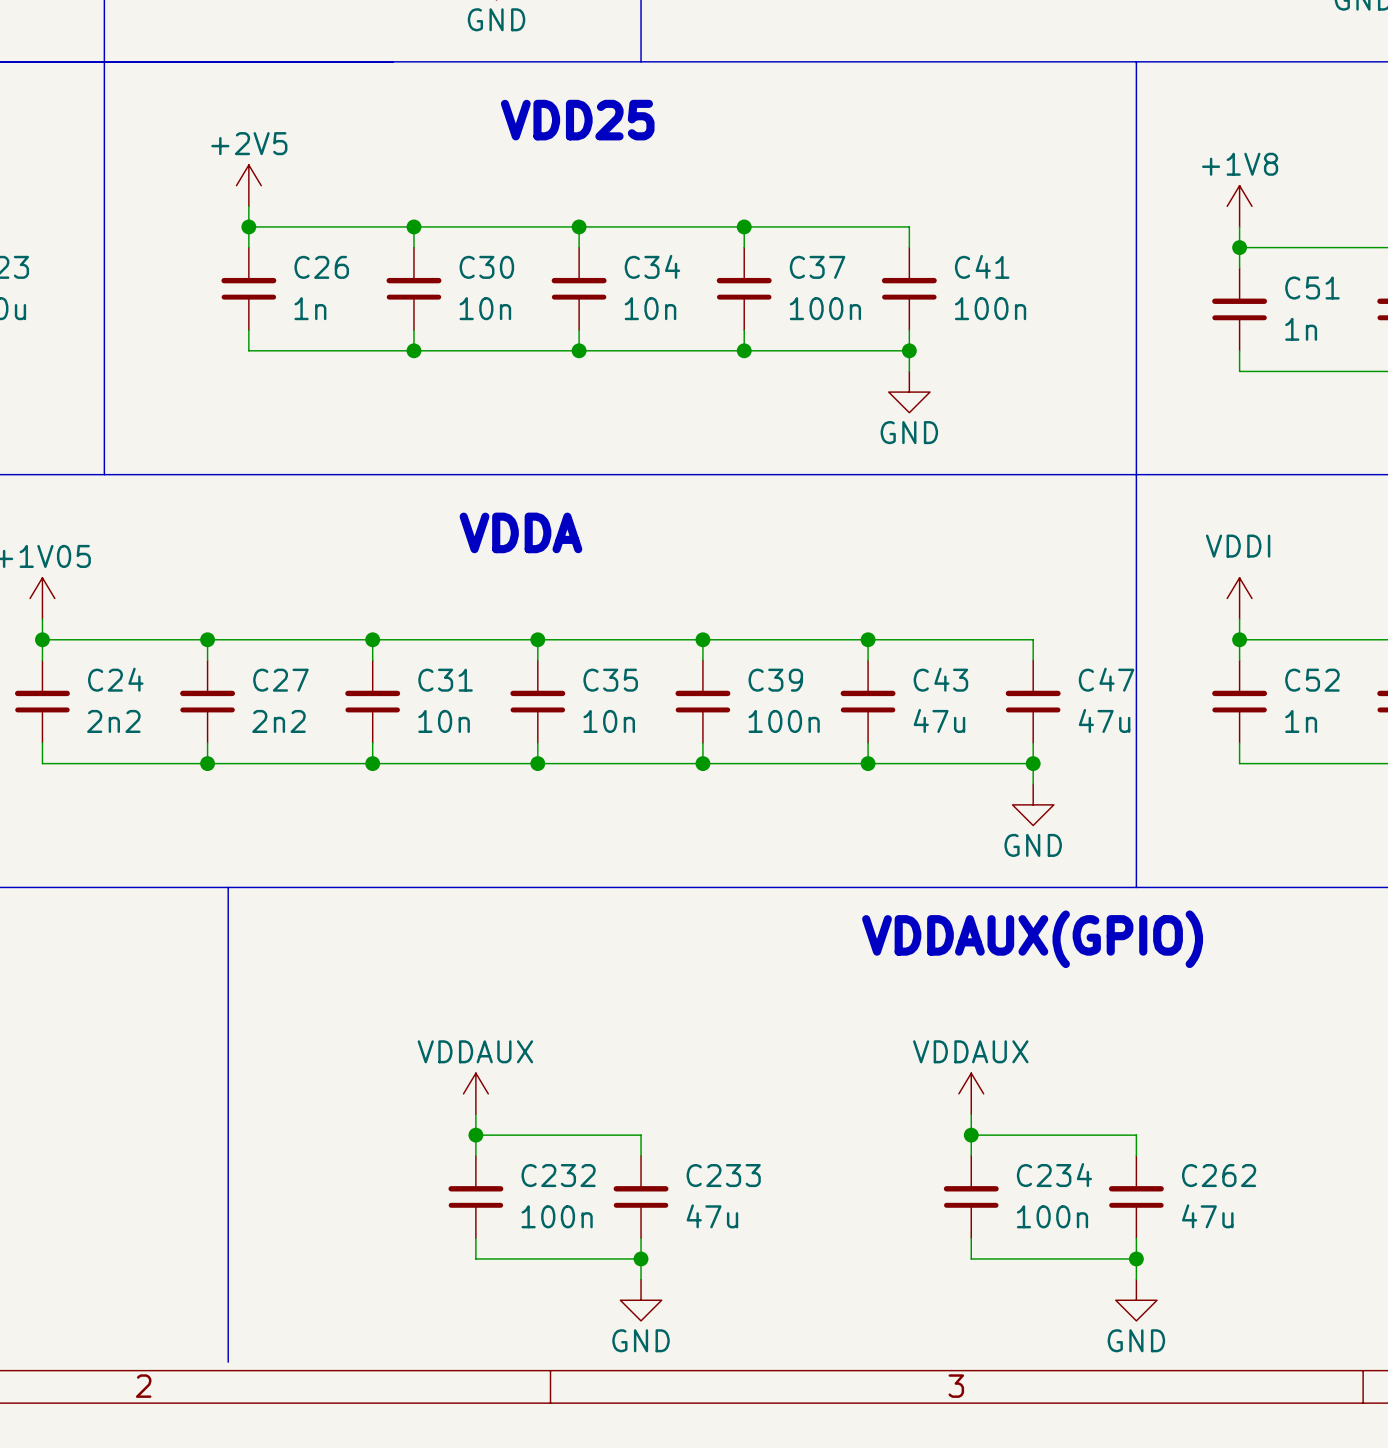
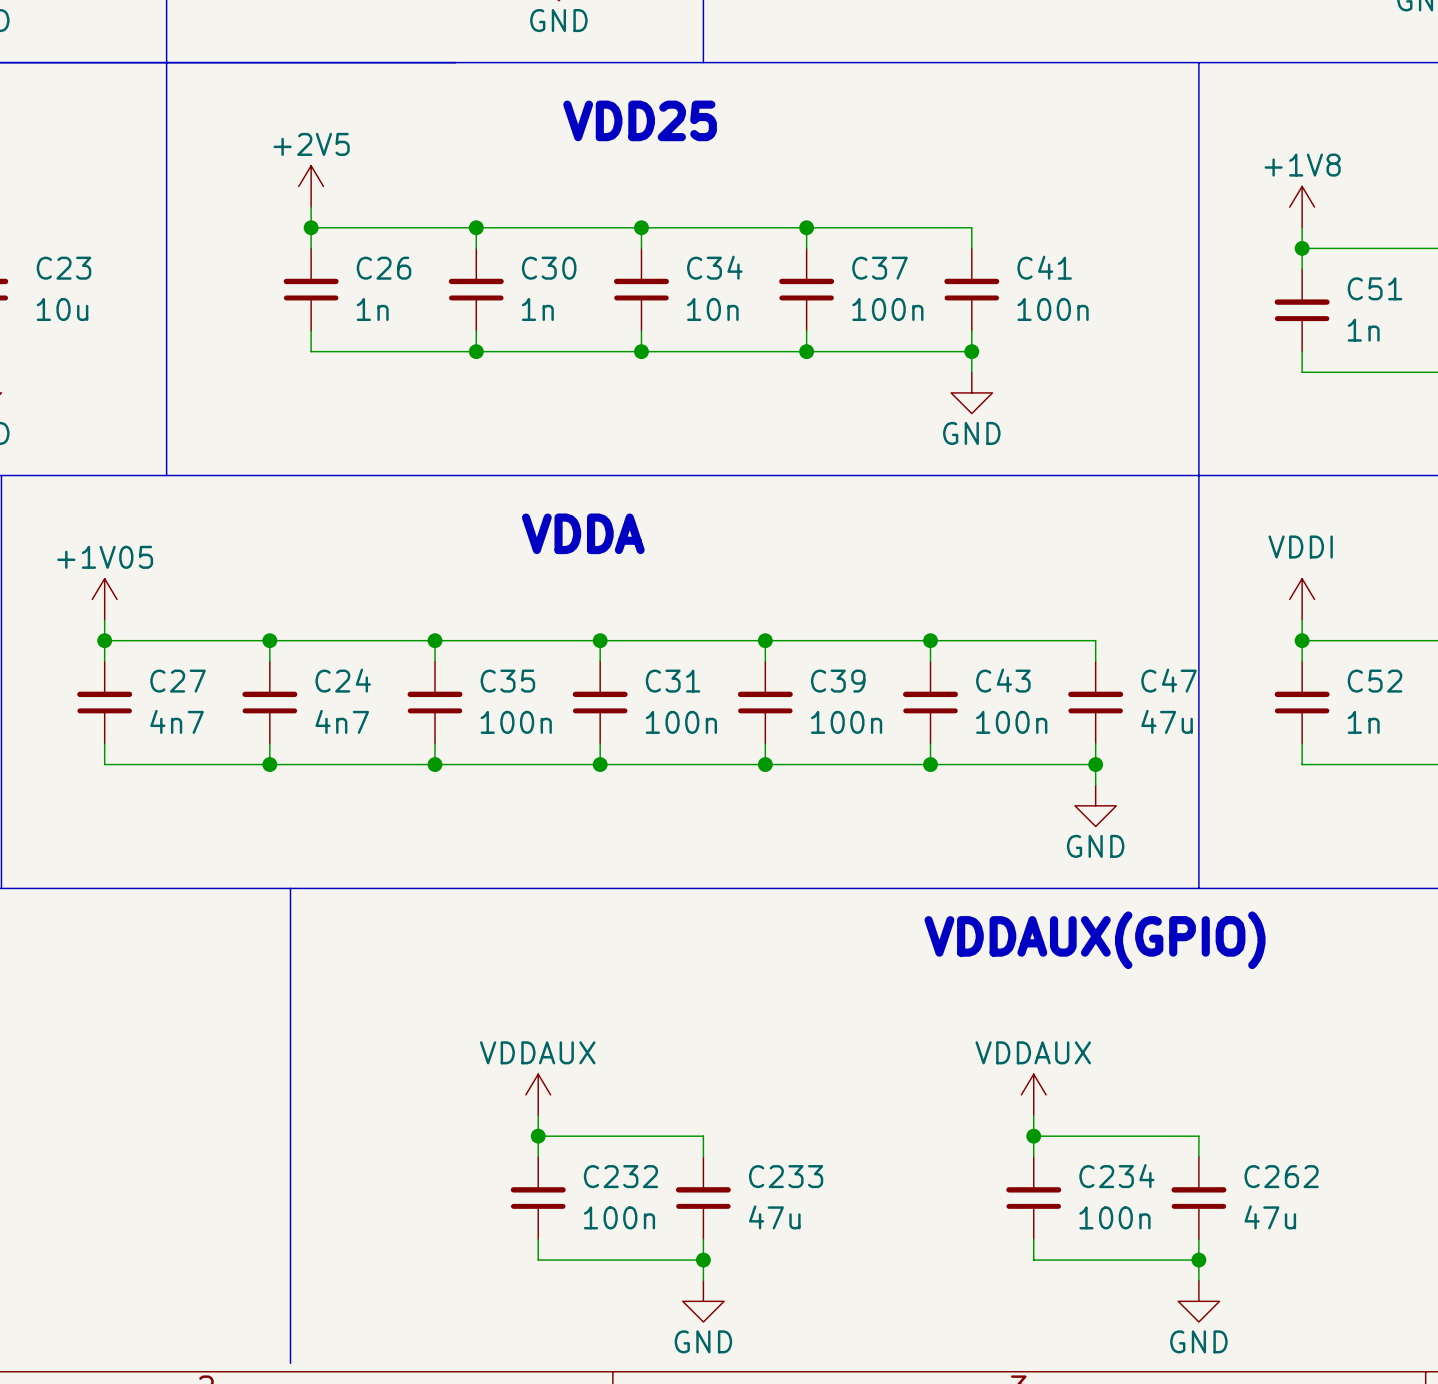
C30 text: 10n (485, 308) -> 1n (537, 309)
C24 name: C24 (115, 679) -> C27 (178, 681)
C27 name: C27 (280, 680) -> C24 (343, 680)
C31 name: C31 (445, 680) -> C35 (507, 681)
C35 name: C35 (610, 680) -> C31 (673, 681)
C43 text: 47u (939, 720) -> 100n (1011, 722)
C24 text: 2n2 (113, 721) -> 4n7 (177, 721)
C27 text: 2n2 (278, 721) -> 4n7 (342, 721)
C31 text: 10n (444, 721) -> 100n (516, 722)
C35 text: 10n (609, 721) -> 100n (681, 722)

